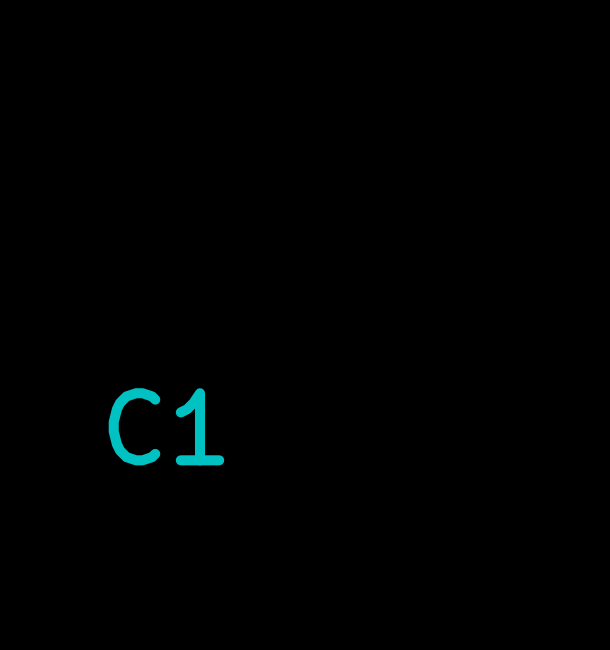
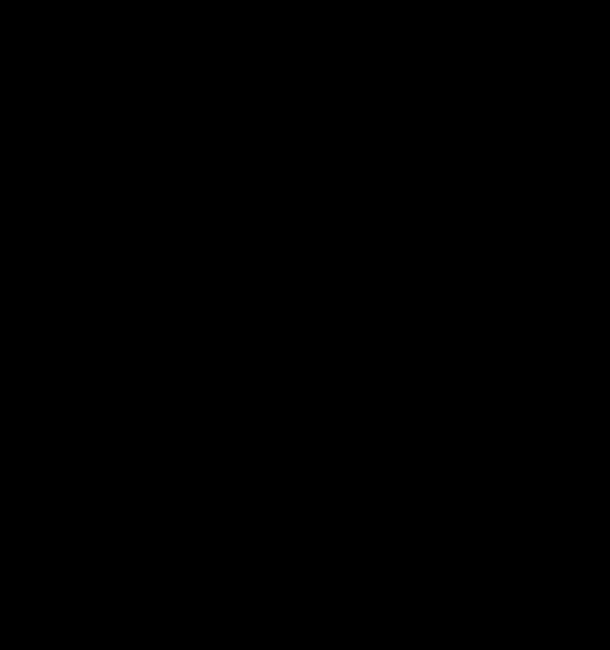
C1: (166, 426) -> none

